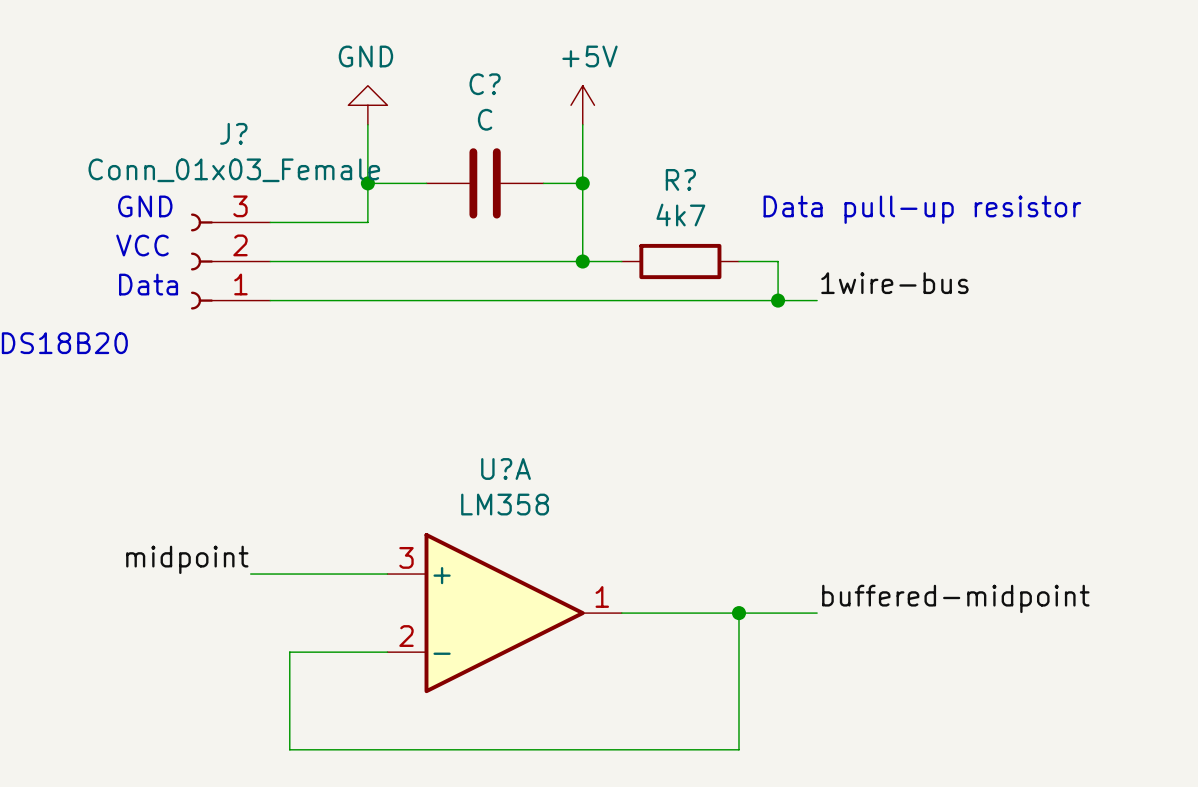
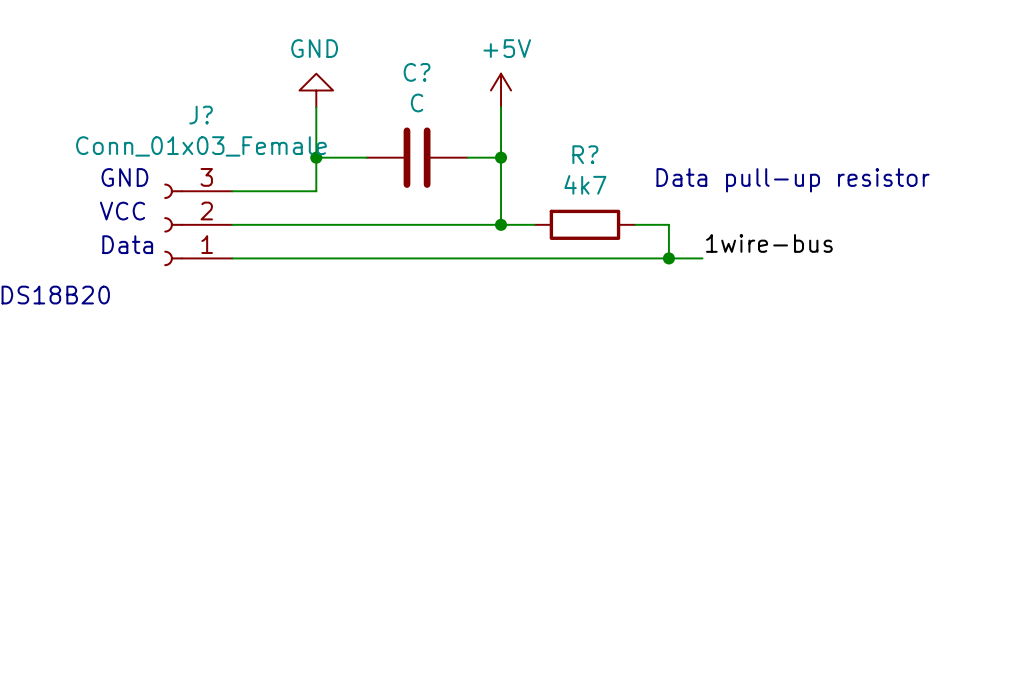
label: midpoint (187, 559) -> none
wire: (250, 574) (387, 574) -> none
label: buffered-midpoint (955, 598) -> none
U?A: LM358 (504, 613) -> none
wire: (621, 613) (817, 613) -> none
wire: (738, 613) (738, 749) (289, 749) (289, 652) (387, 652) -> none
junction: (738, 613) -> none

